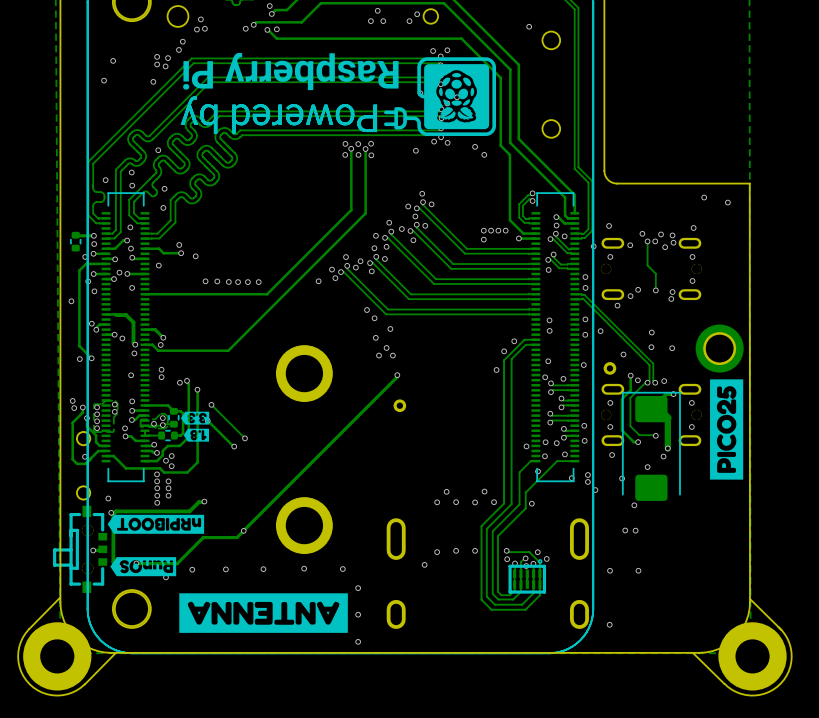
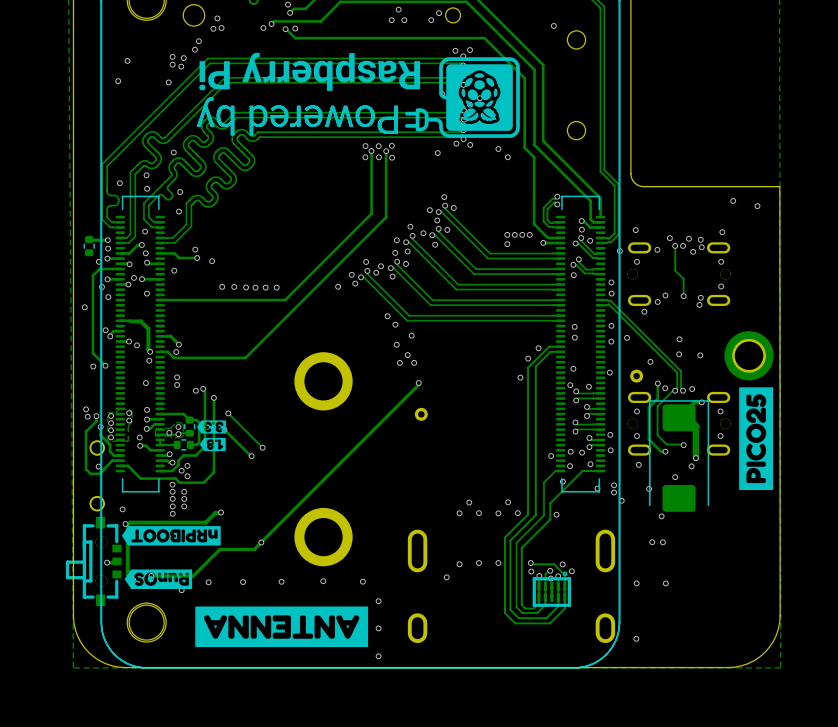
board edge: (60, 597) (23, 637) (18, 651) (19, 666) (29, 684) (47, 694) (67, 694) (84, 684) -> none
board edge: (749, 598) (781, 629) -> none
board edge: (778, 627) (789, 642) (791, 657) (788, 671) (780, 683) (769, 691) (755, 695) (736, 692) (724, 683) -> none
board edge: (115, 652) (84, 684) -> none
board edge: (692, 652) (724, 683) -> none
part: (57, 656) -> none
part: (752, 656) -> none

